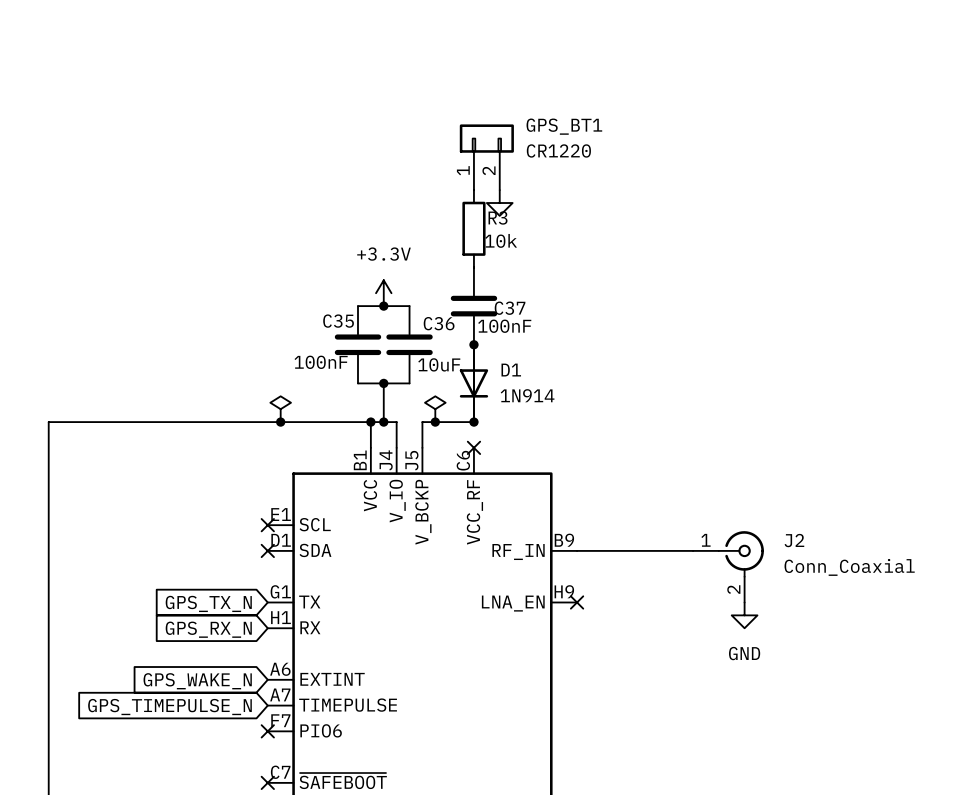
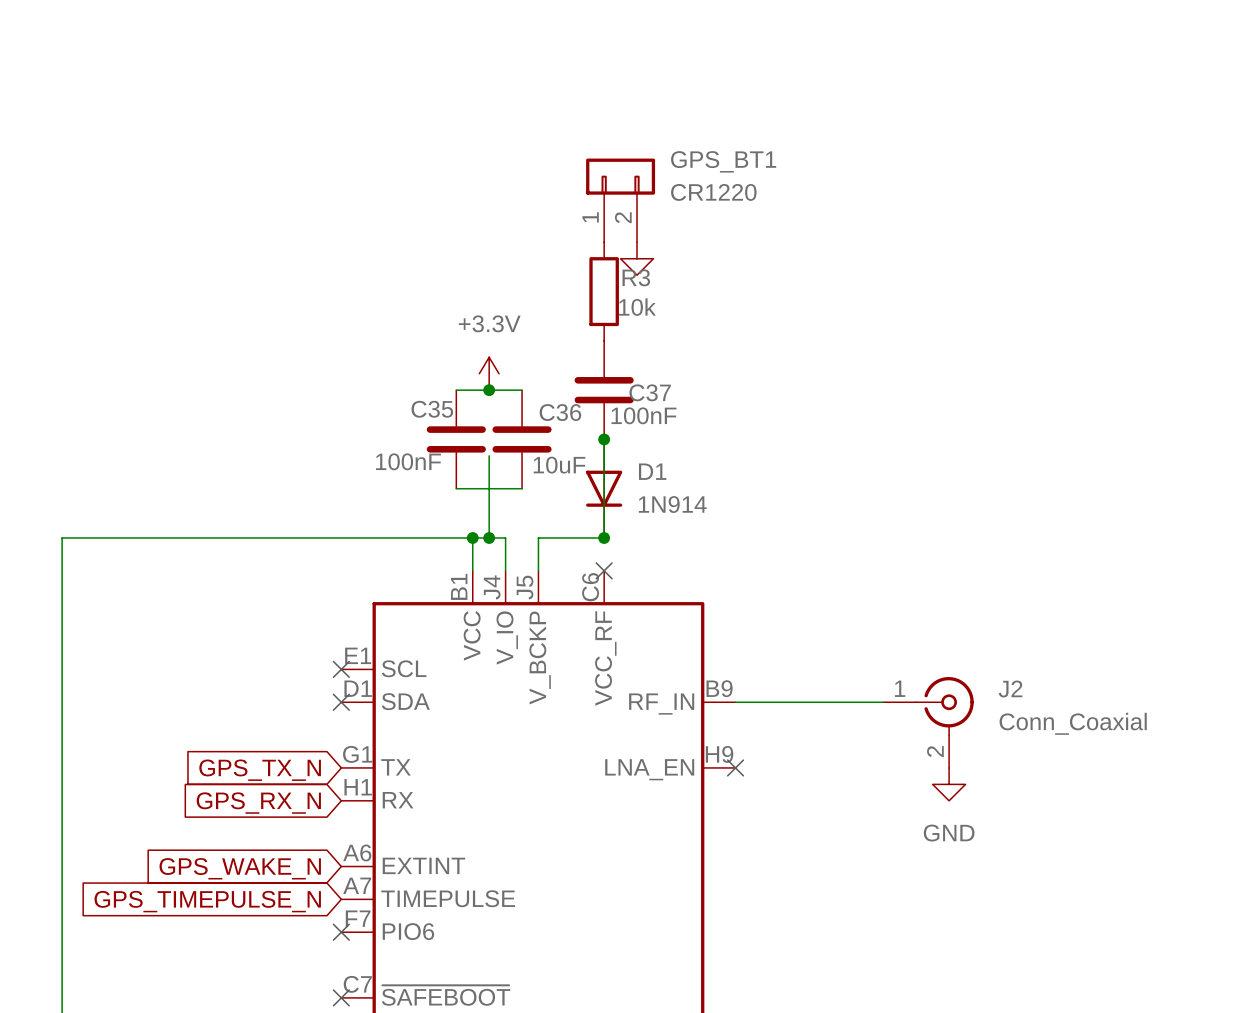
wire: none -> (489, 455) (489, 488)
junction: (383, 383) -> none
power symbol: (280, 409) -> none
power symbol: (435, 409) -> none
junction: (280, 422) -> none
junction: (435, 422) -> none

